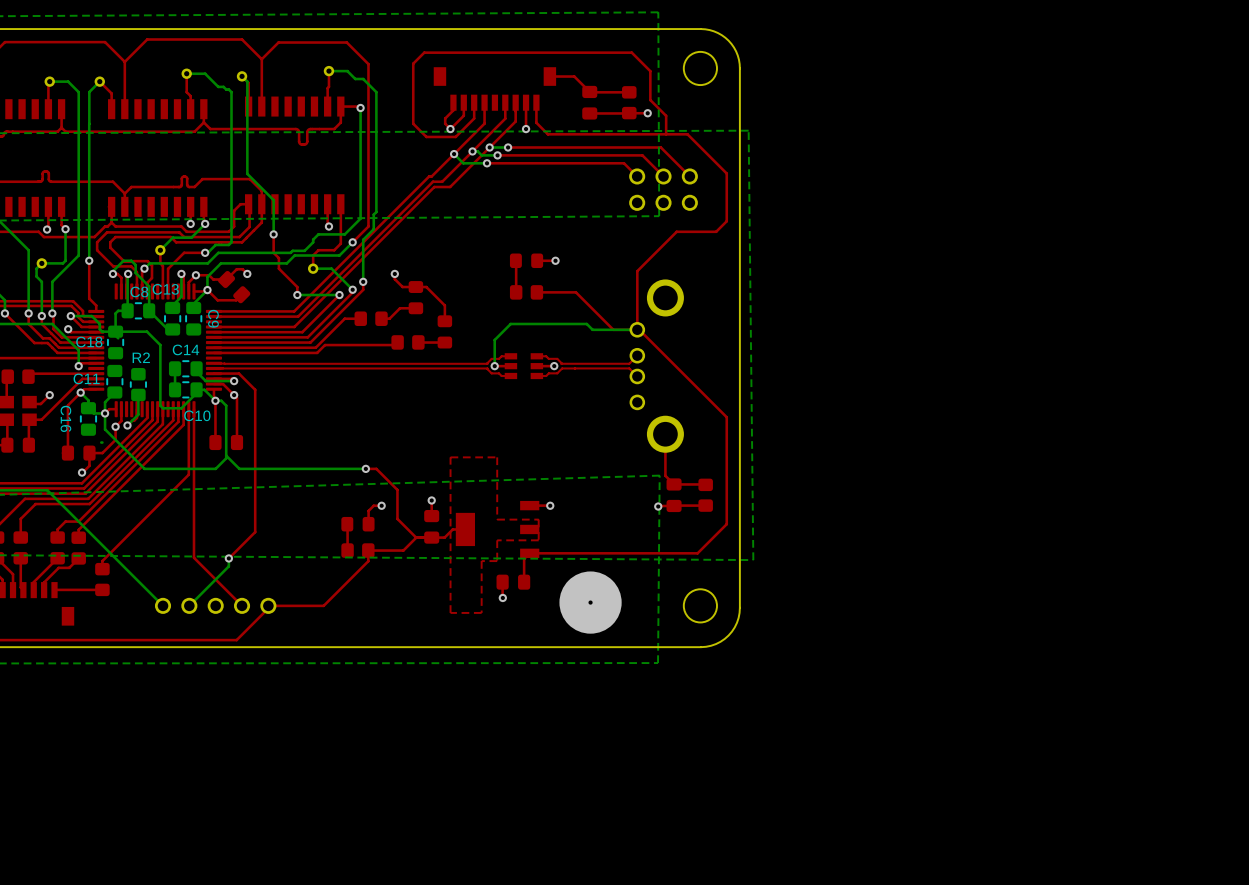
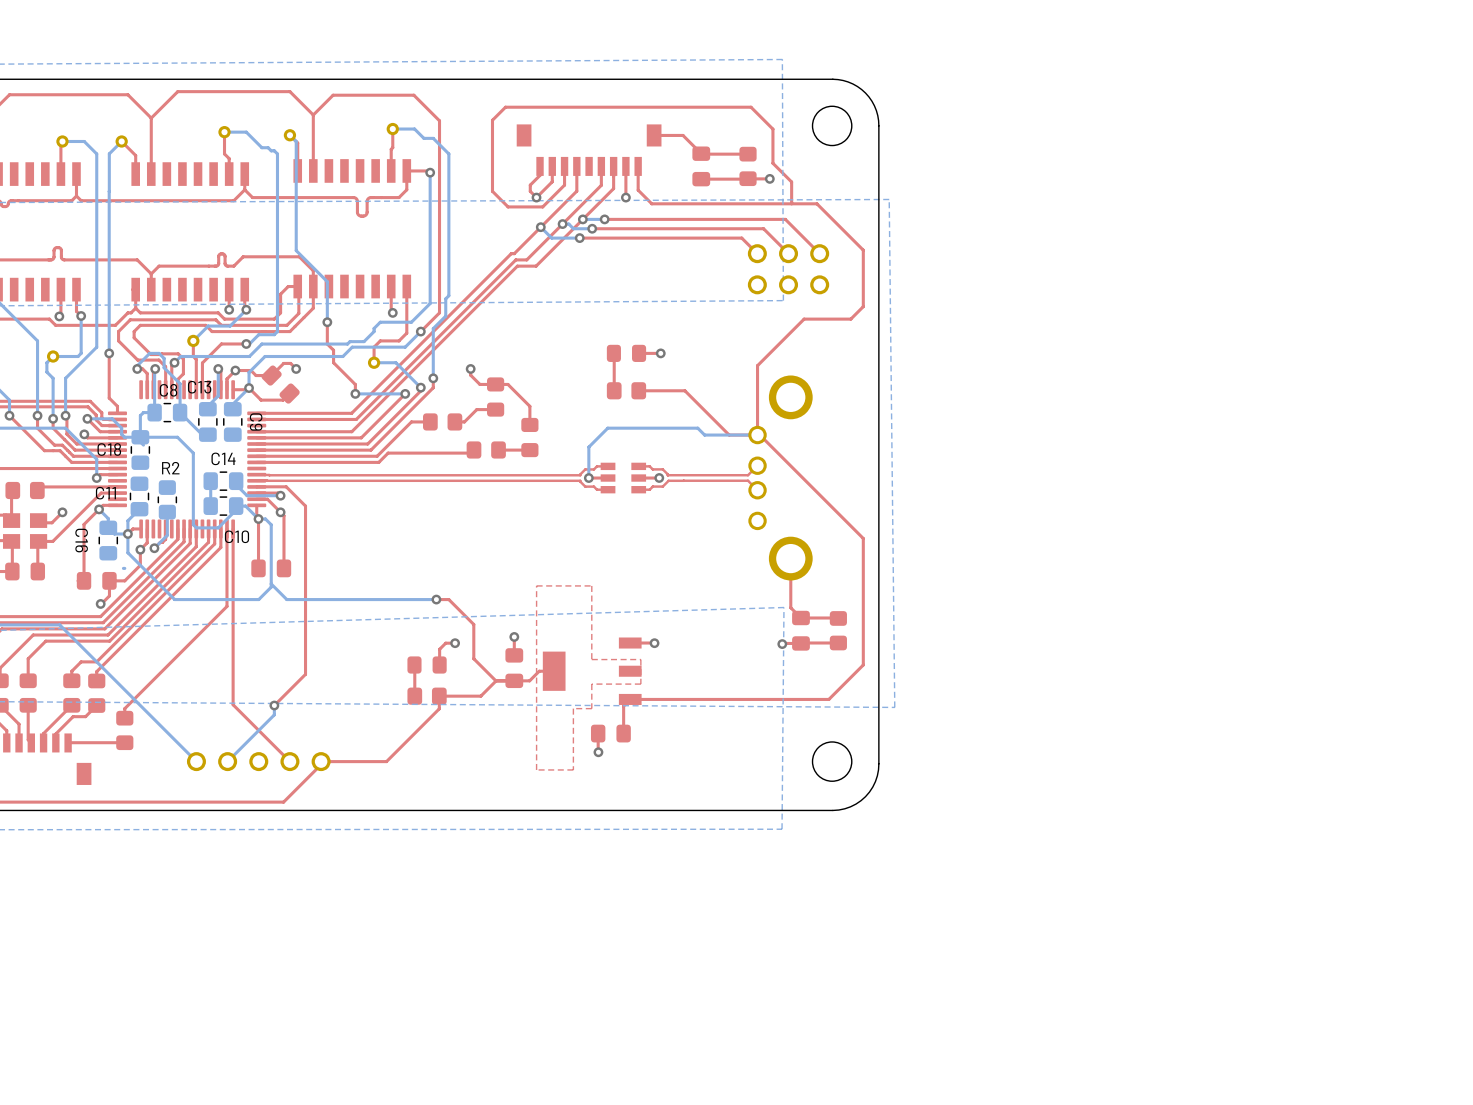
via: (590, 602) -> none

